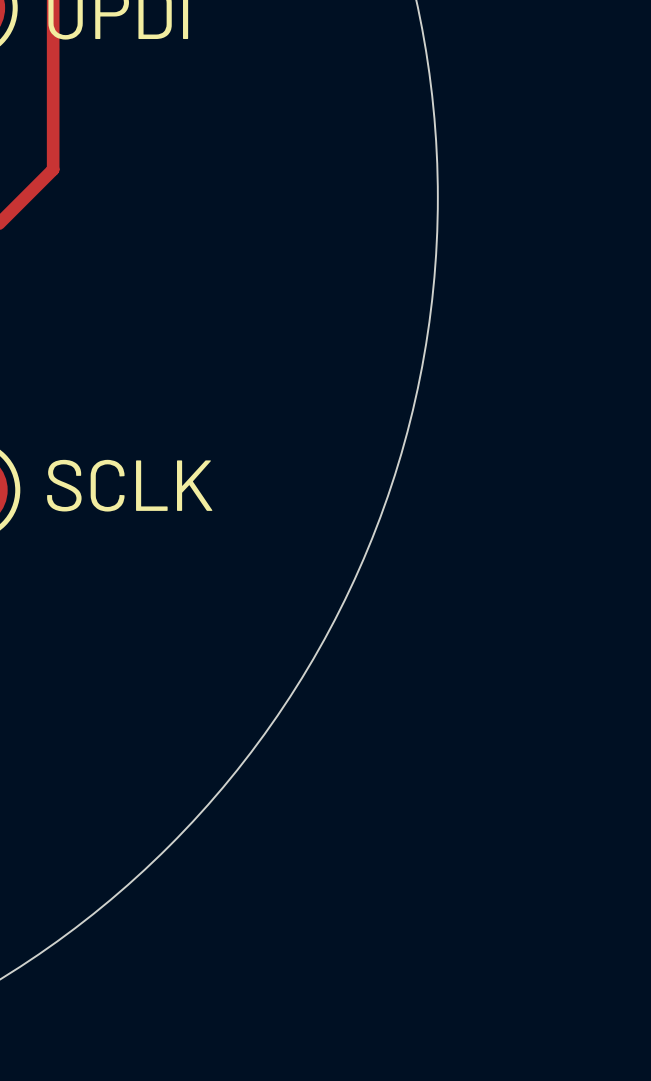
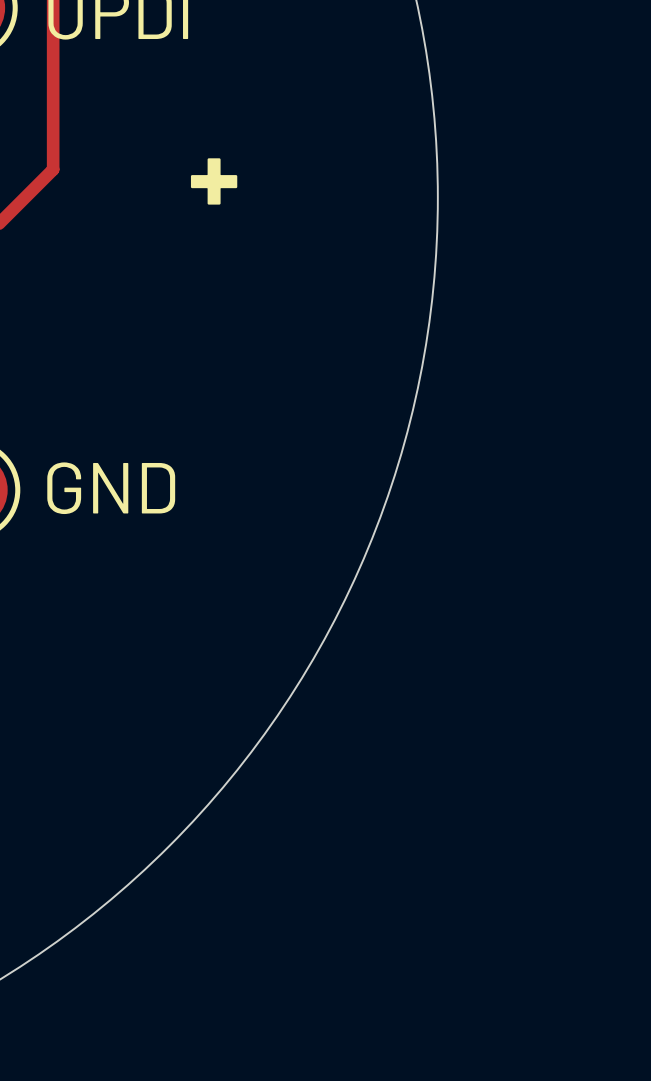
text: none -> + (214, 181)
SCLK name: SCLK (129, 485) -> GND (111, 488)

